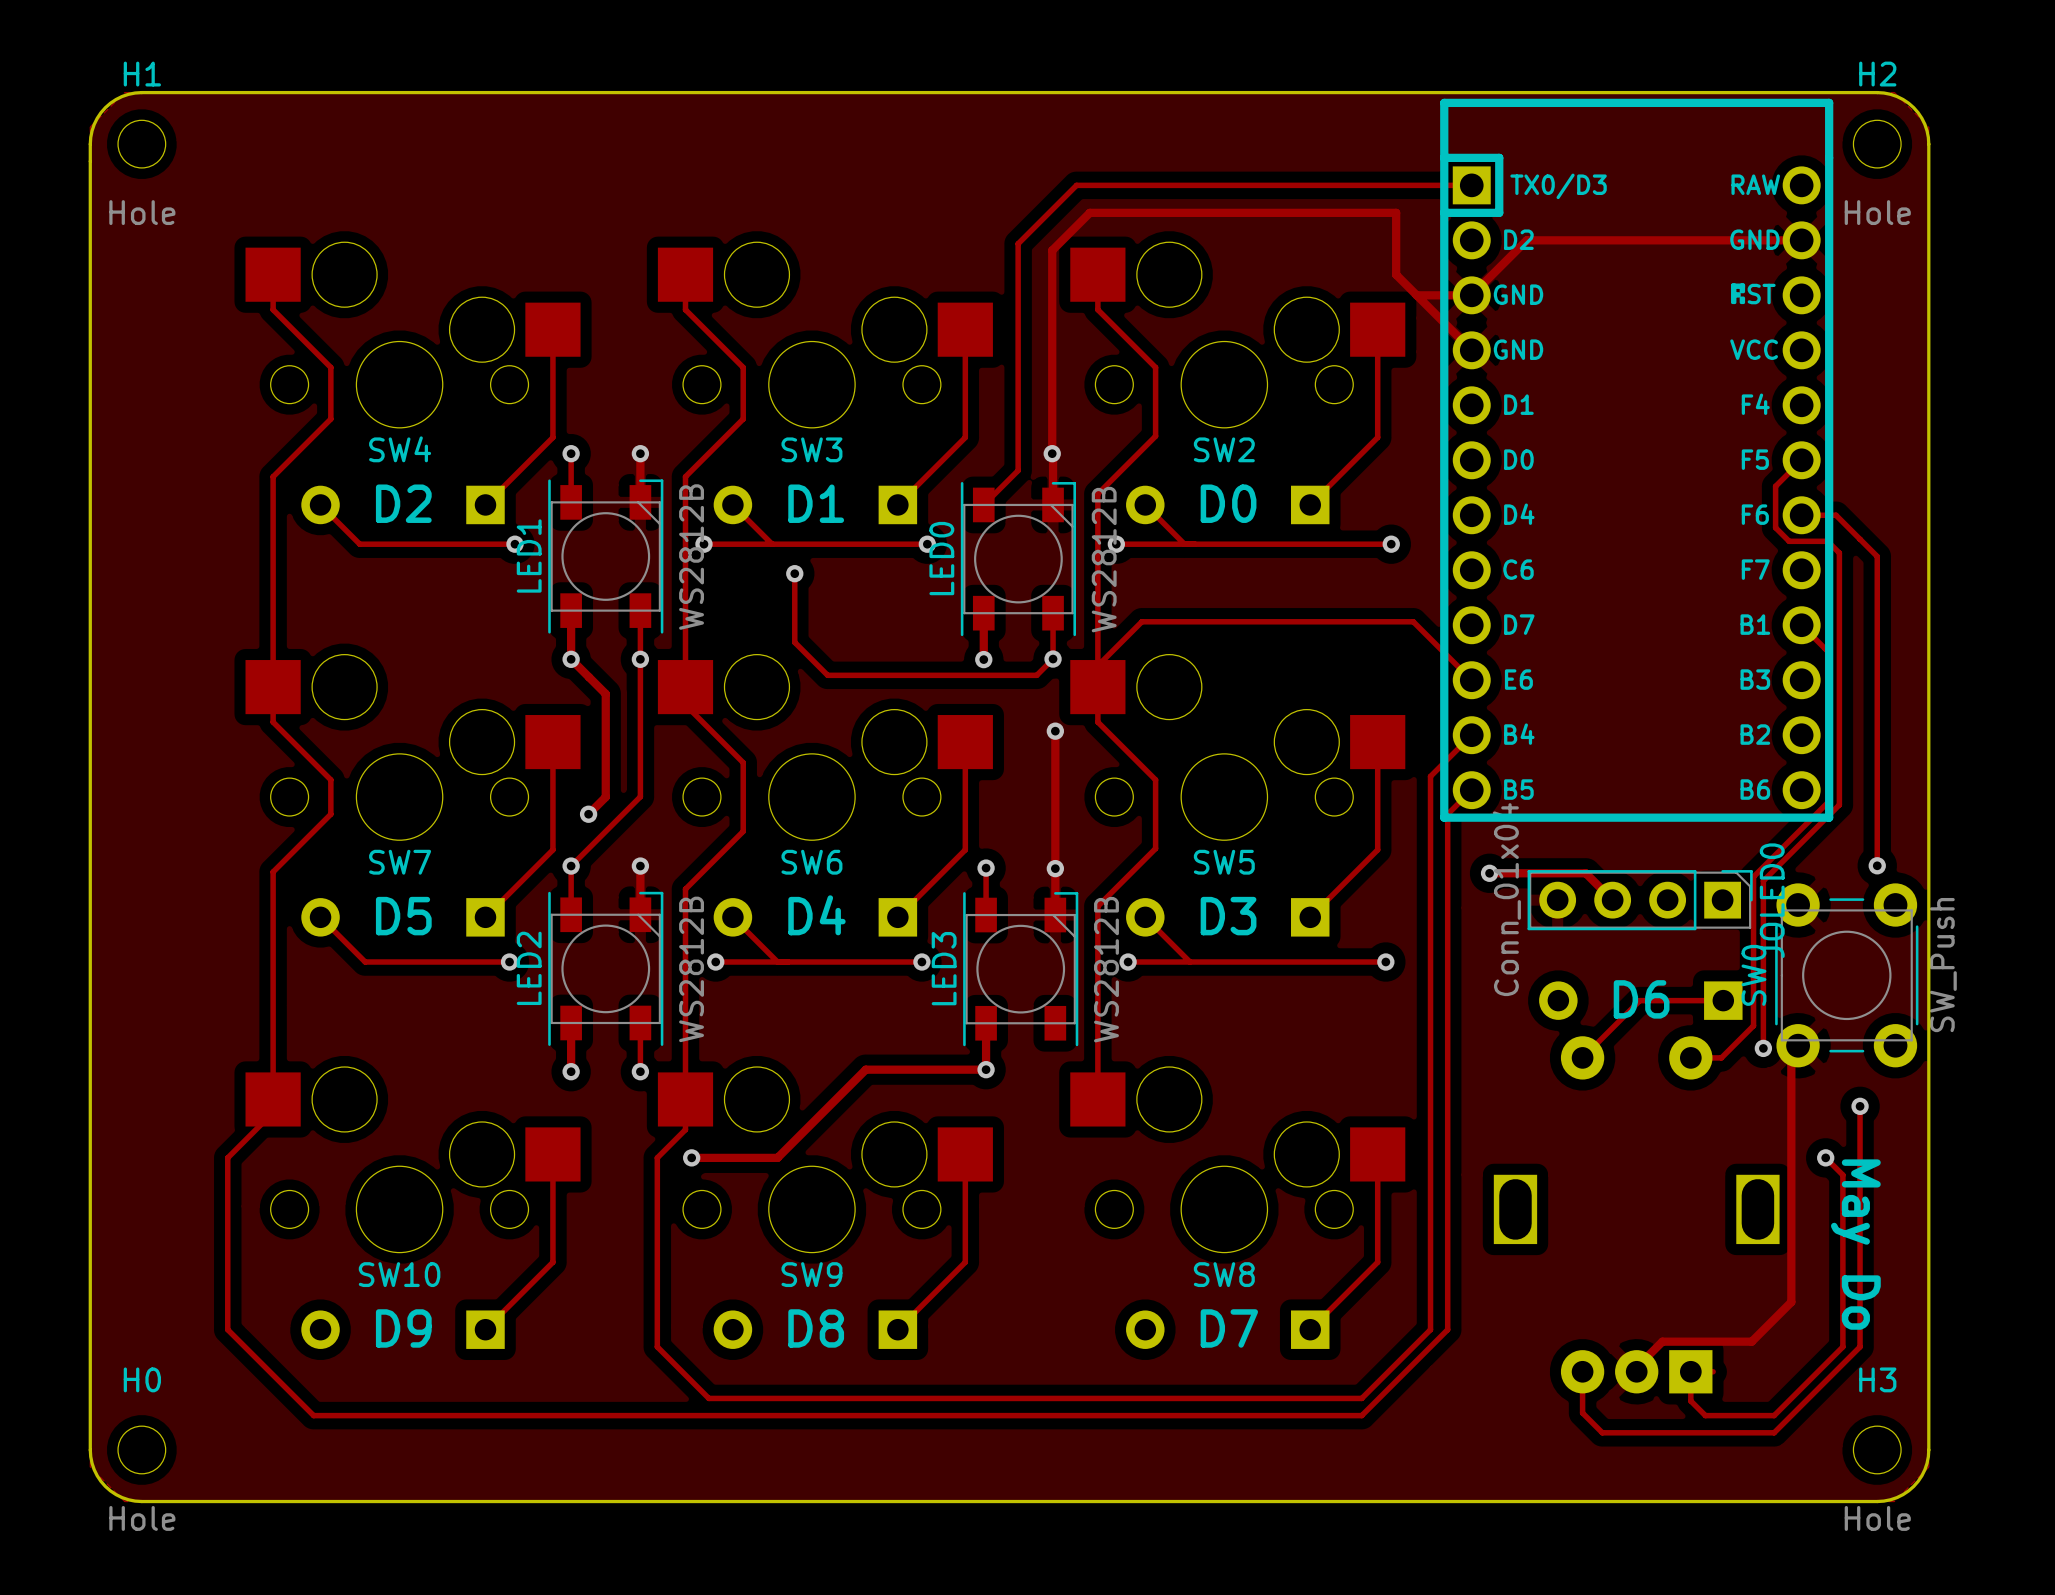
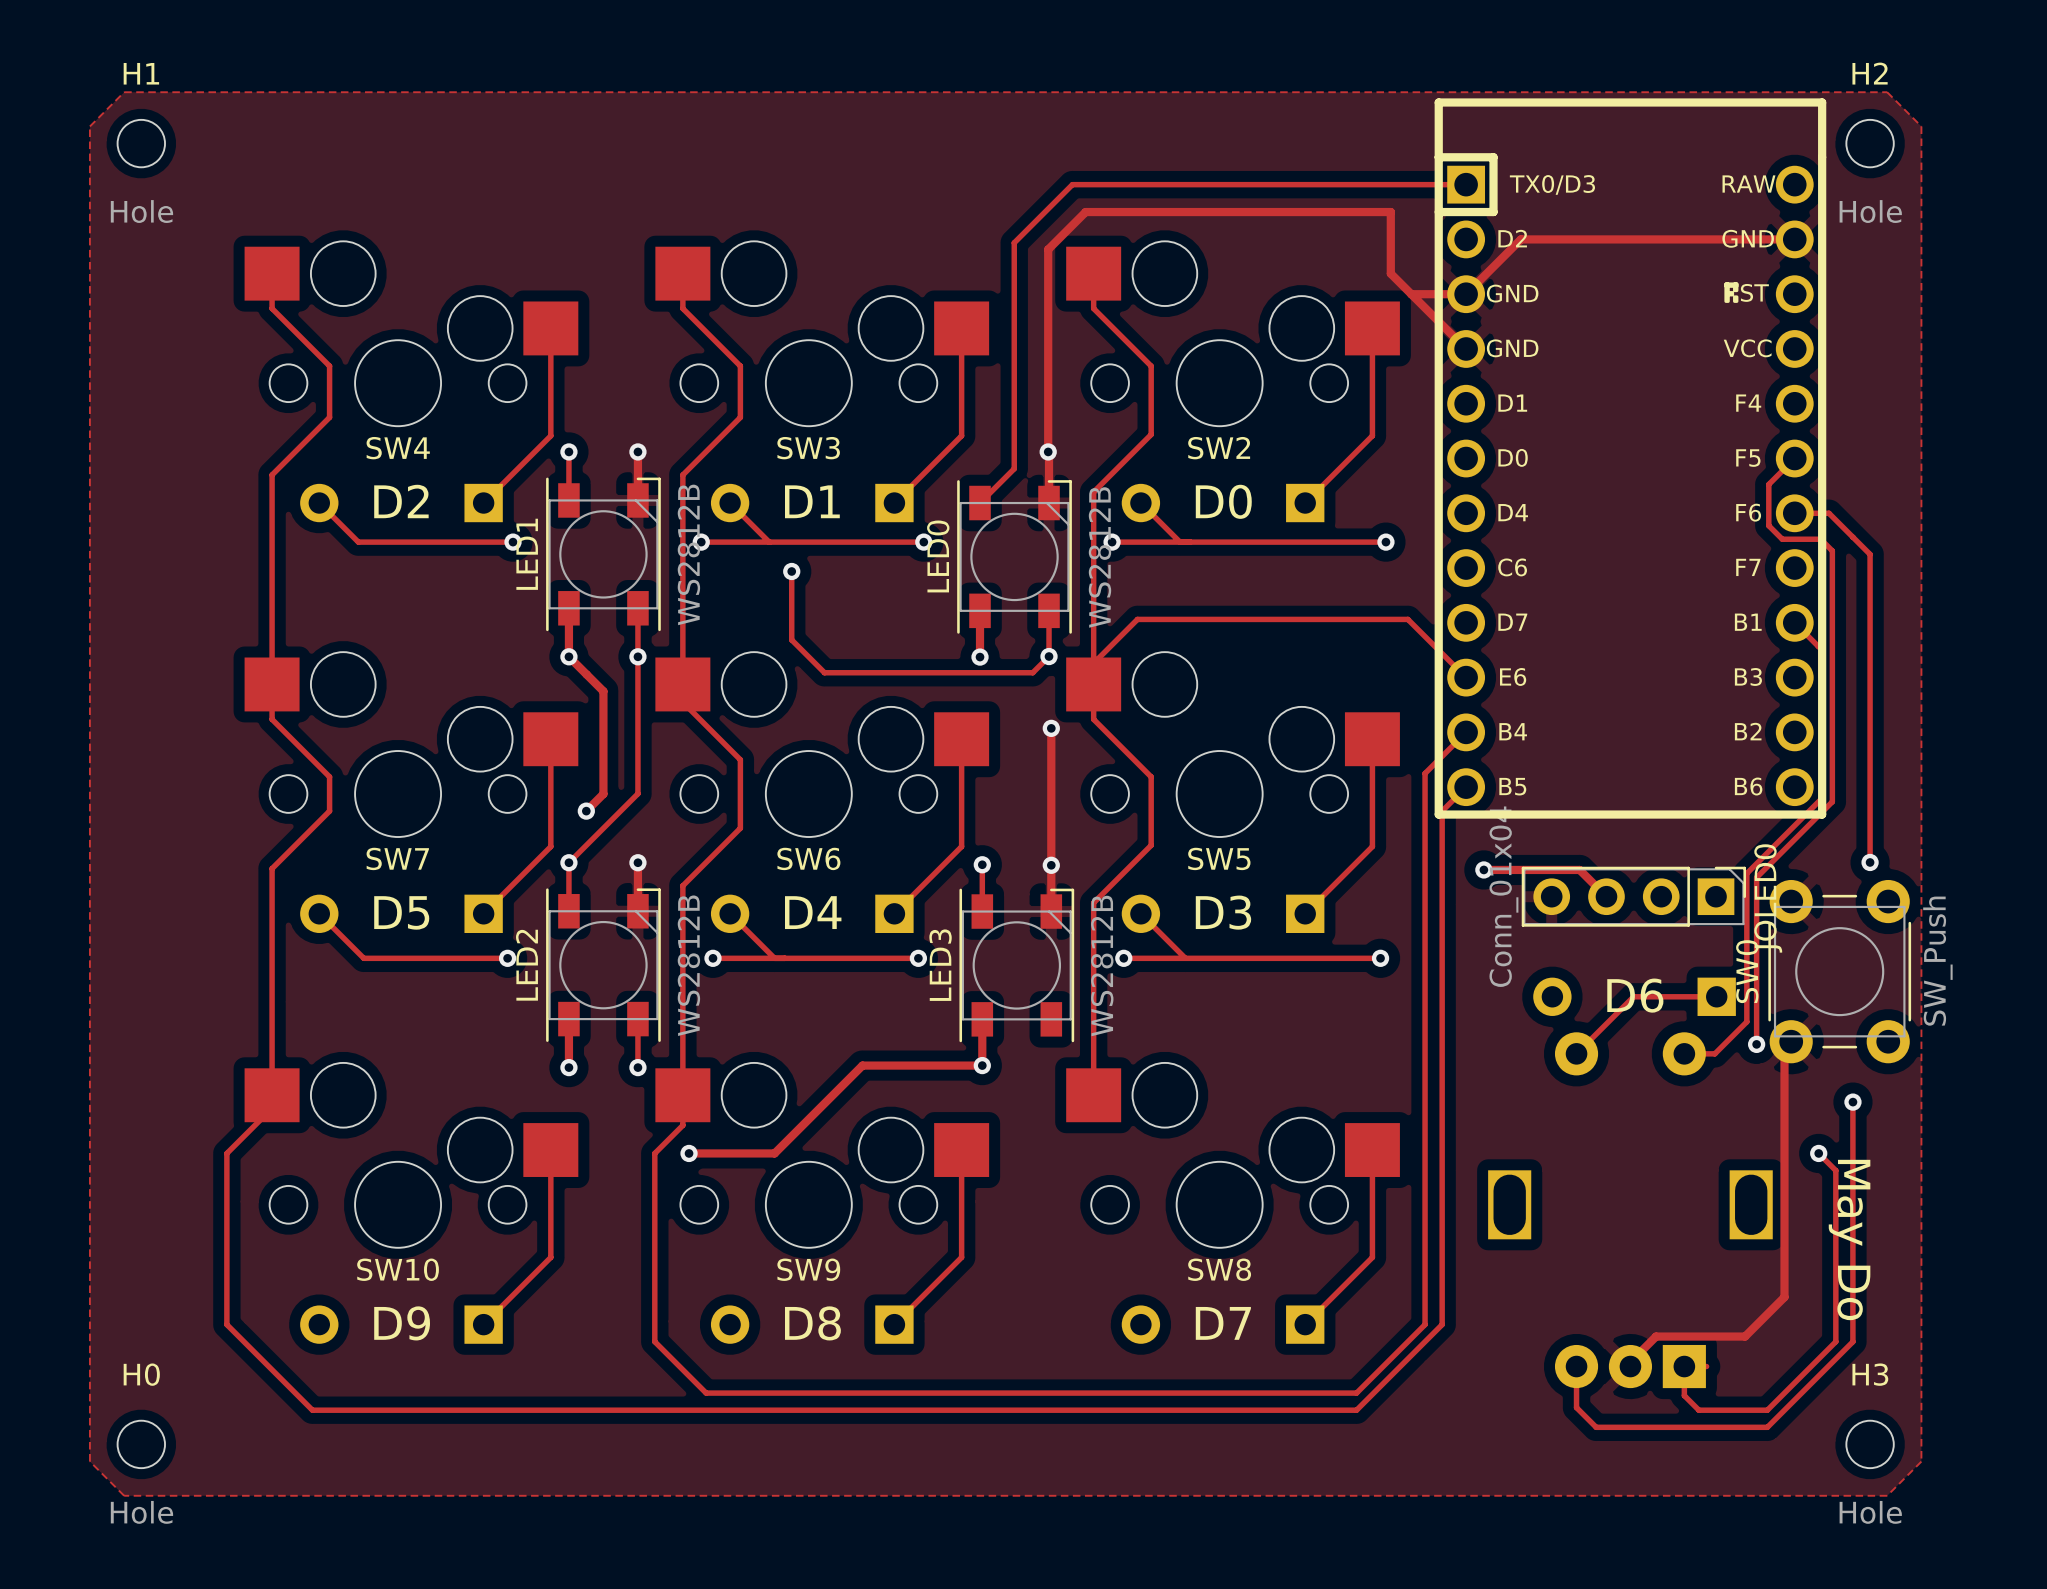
board edge: (141, 92) (1877, 92) (1890, 94) (1908, 103) (1918, 112) (1924, 124) (1928, 144) (1928, 1449) (1924, 1469) (1918, 1481) (1908, 1490) (1896, 1497) (1877, 1501) (141, 1501) (128, 1499) (110, 1490) (97, 1475) (92, 1463) (90, 1449) (90, 144) (94, 124) (105, 107) (122, 96) (141, 92) -> none

